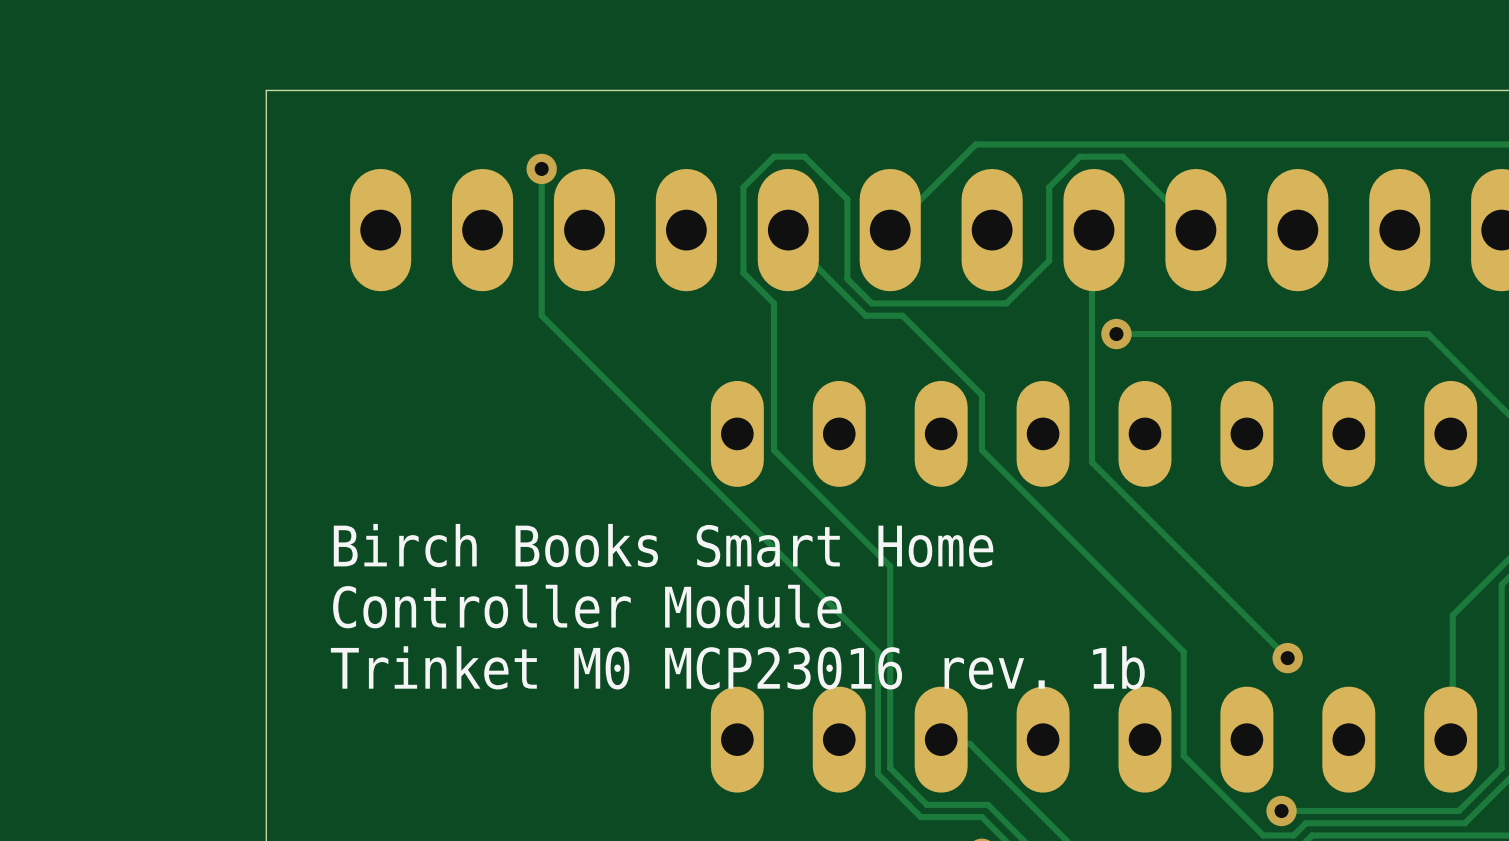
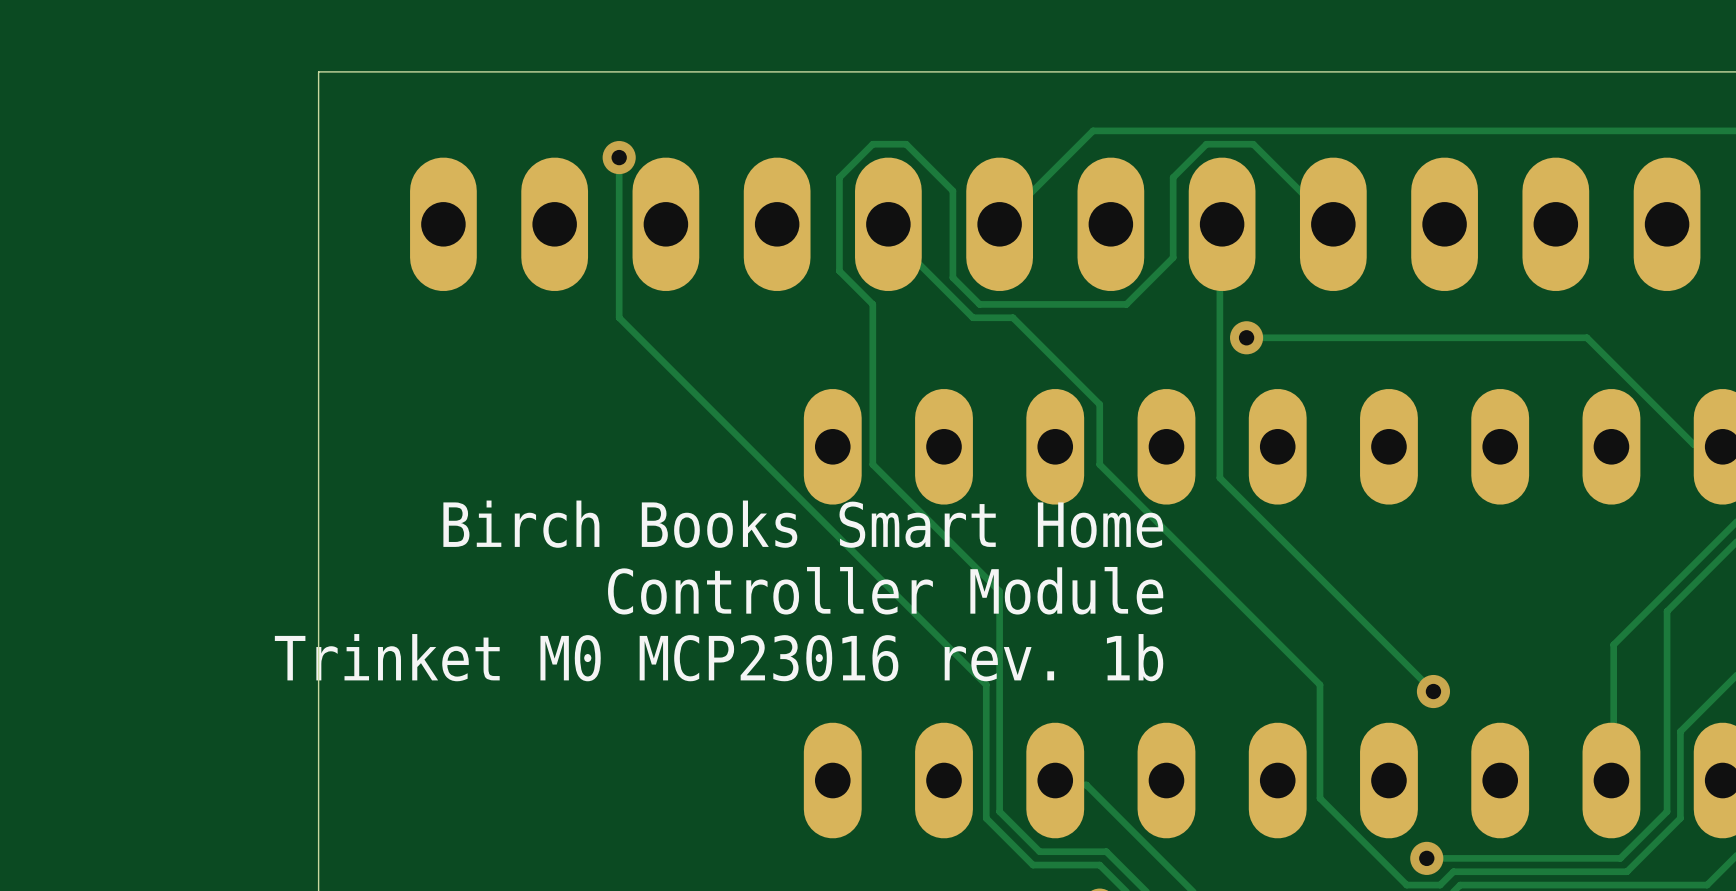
text position: Birch Books Smart Home (663, 545) -> Birch Books Smart Home (803, 524)
text position: Controller Module (587, 606) -> Controller Module (885, 590)
text position: Trinket M0 MCP23016 rev. 1b (737, 667) -> Trinket M0 MCP23016 rev. 1b (719, 657)

